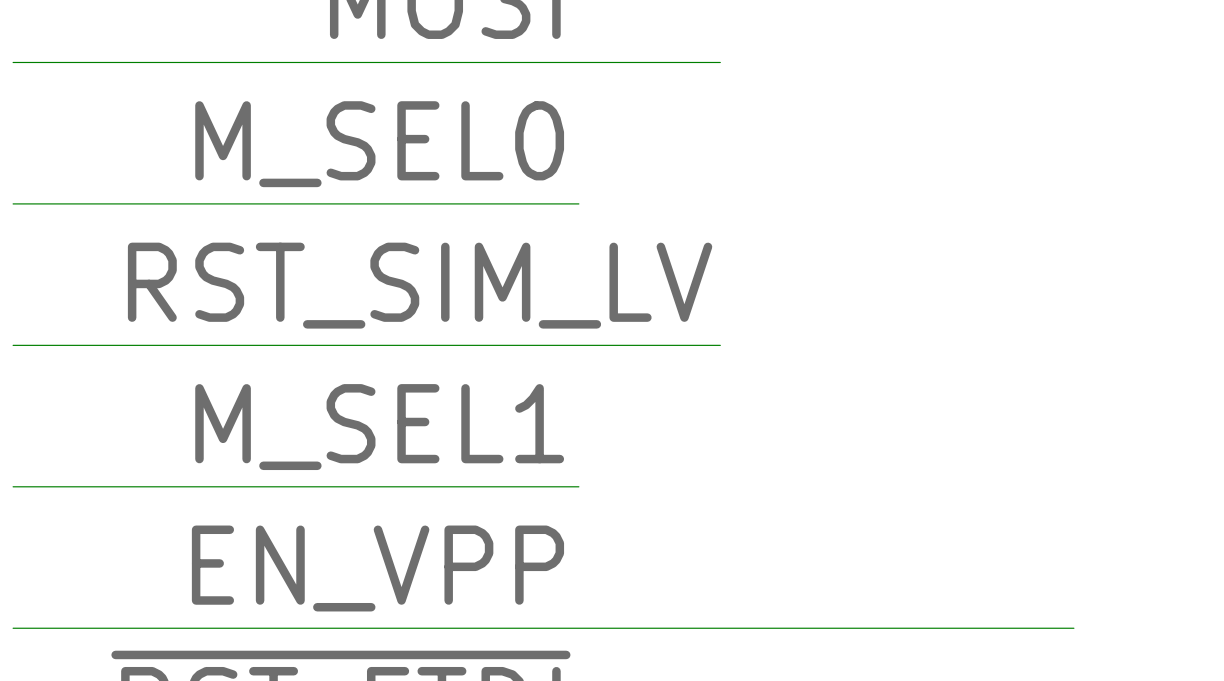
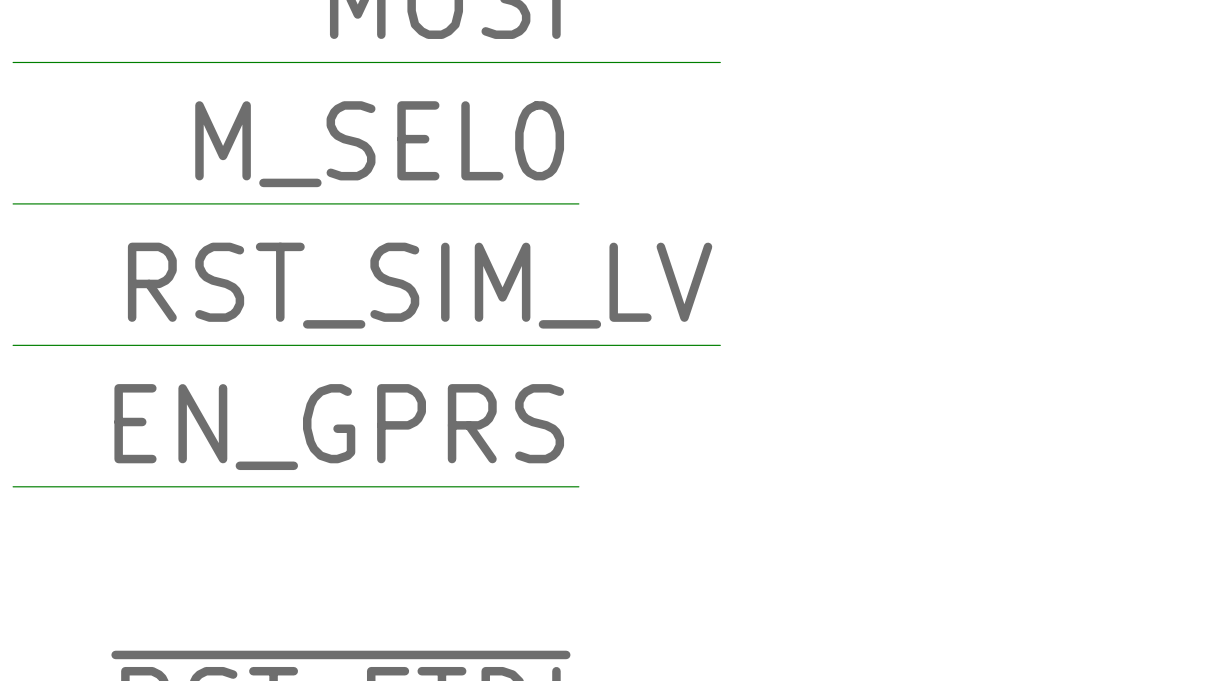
label: M_SEL1 (379, 427) -> EN_GPRS (339, 427)
label: EN_VPP (377, 568) -> none
wire: (13, 628) (1073, 628) -> none

